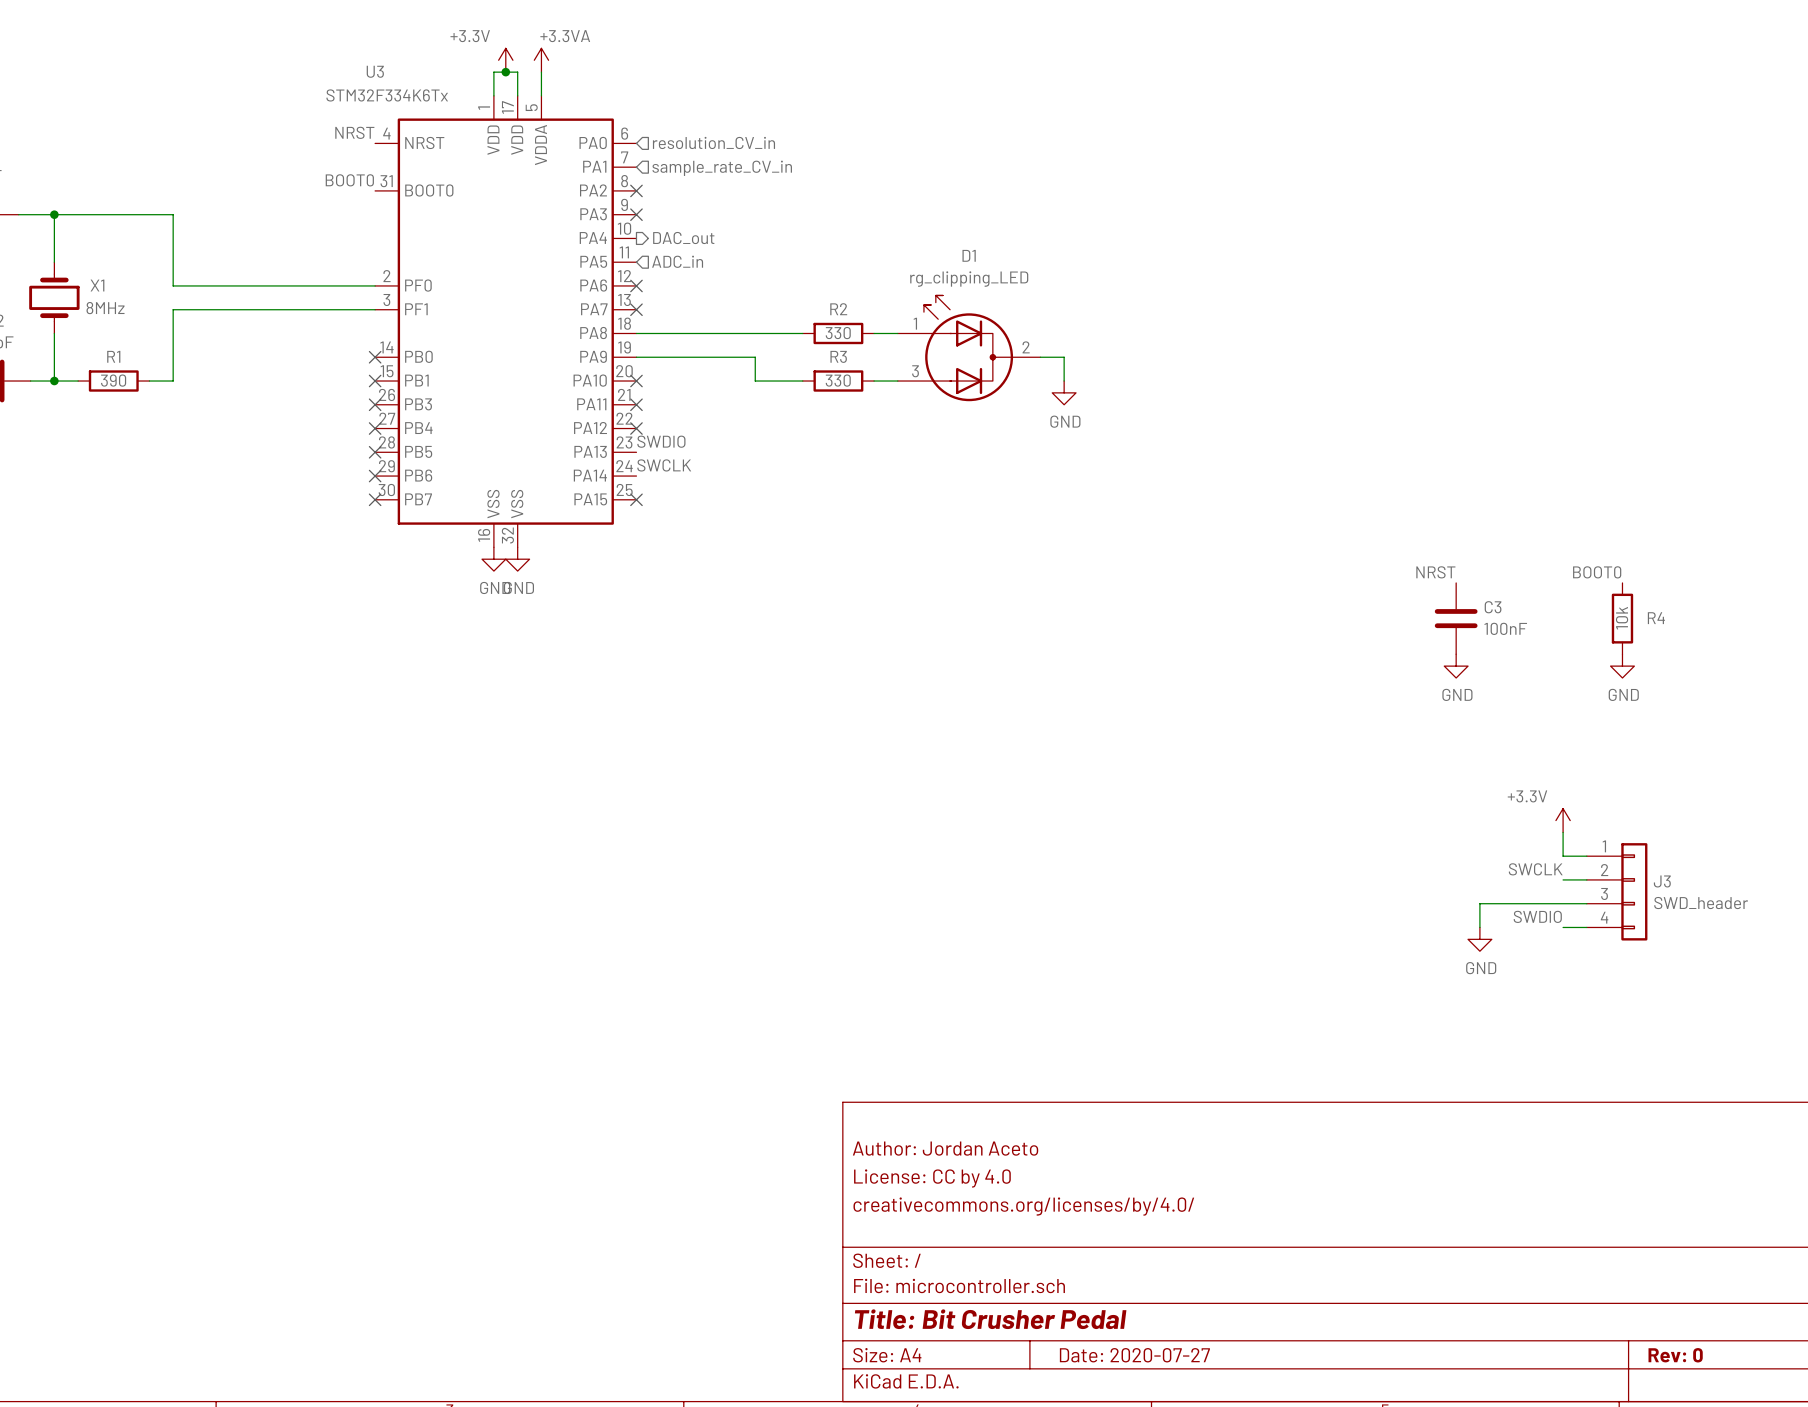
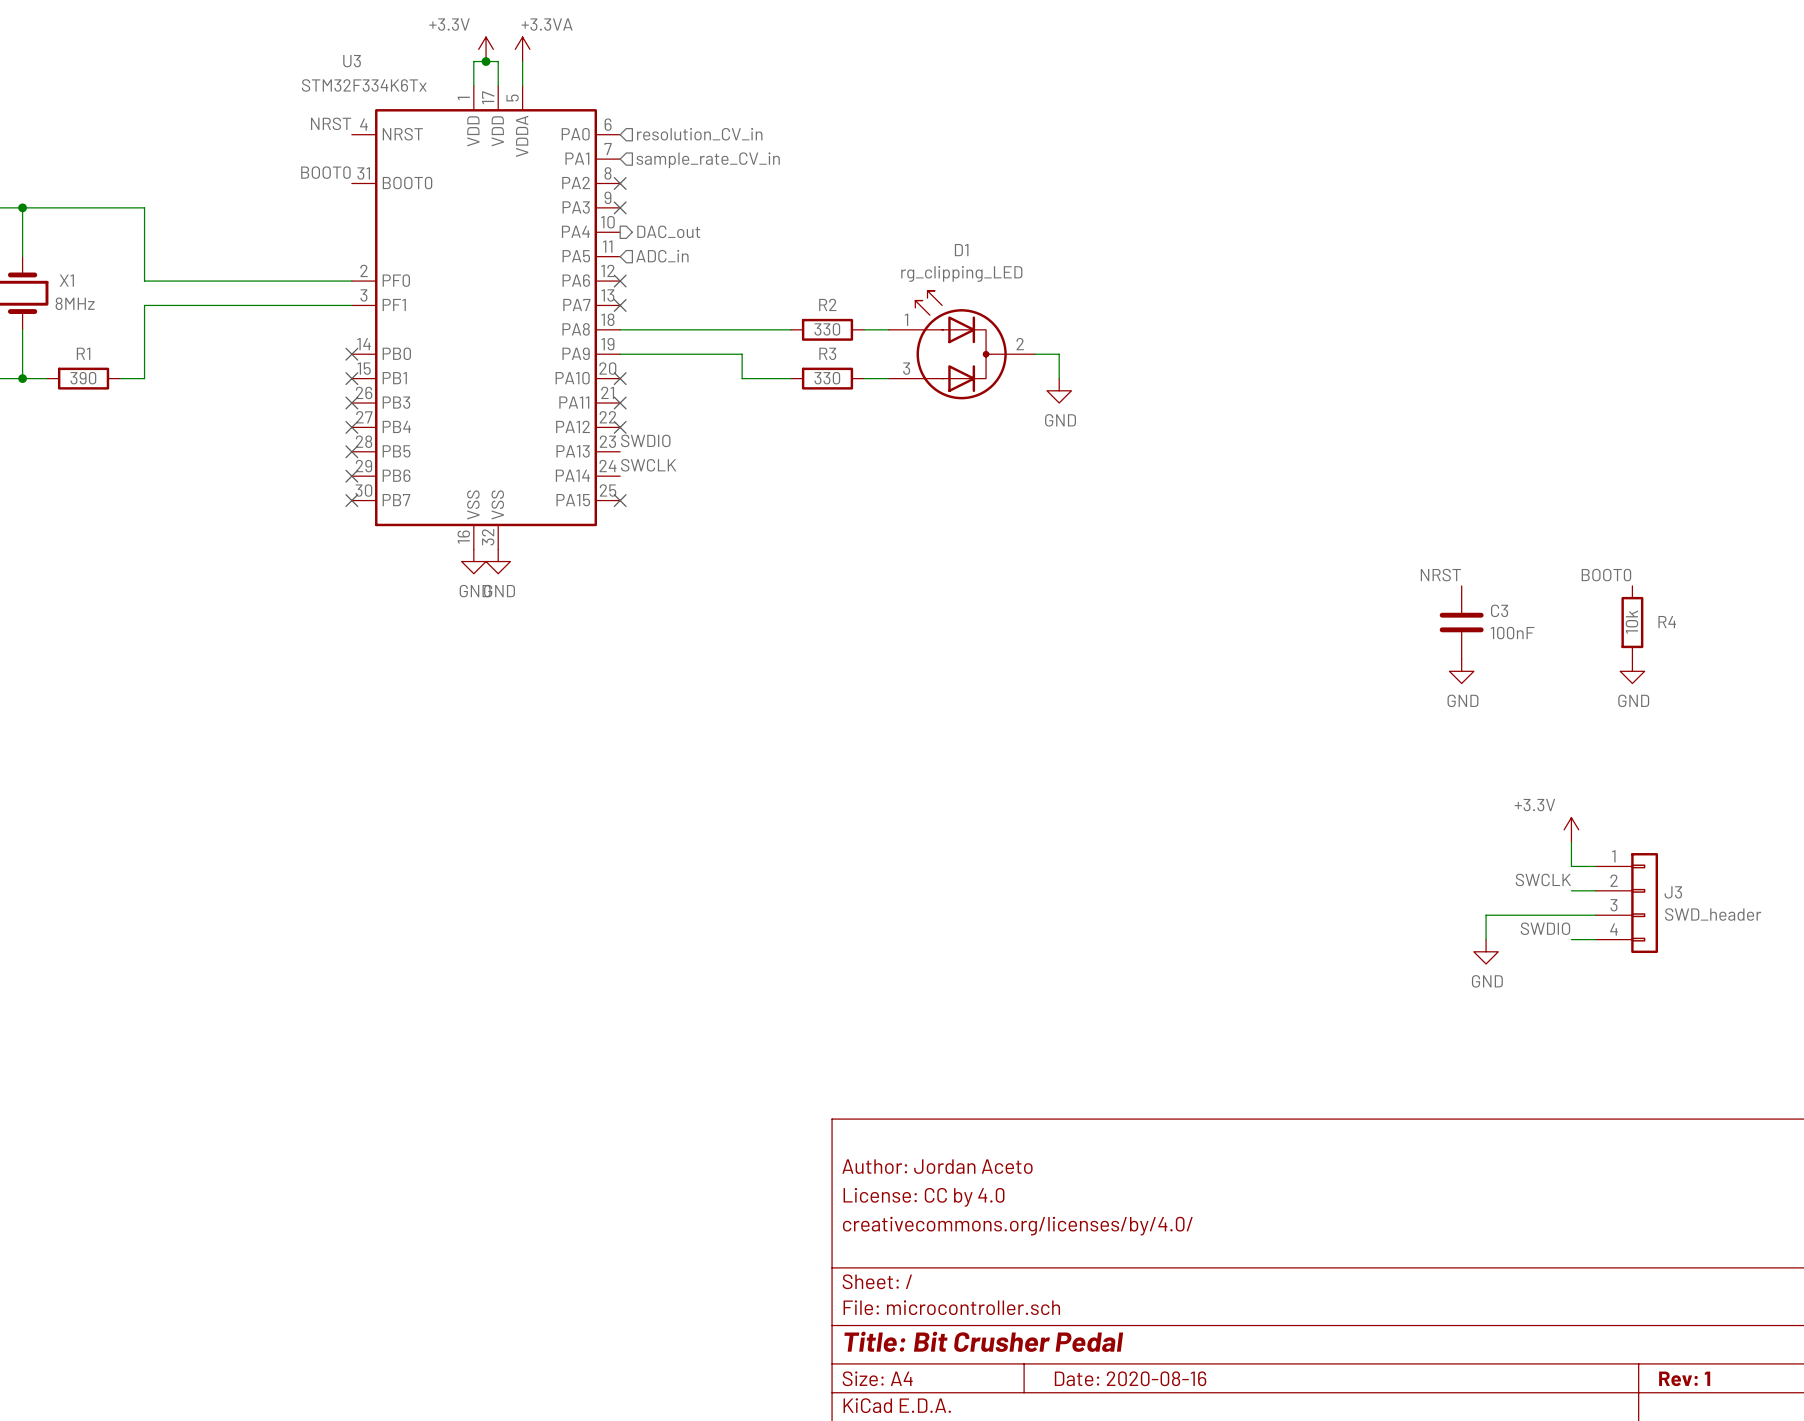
title block: Date: 2020-07-27 (1134, 1355) -> Date: 2020-08-16 (1130, 1378)
title block: Rev: 0 (1675, 1355) -> Rev: 1 (1684, 1378)

